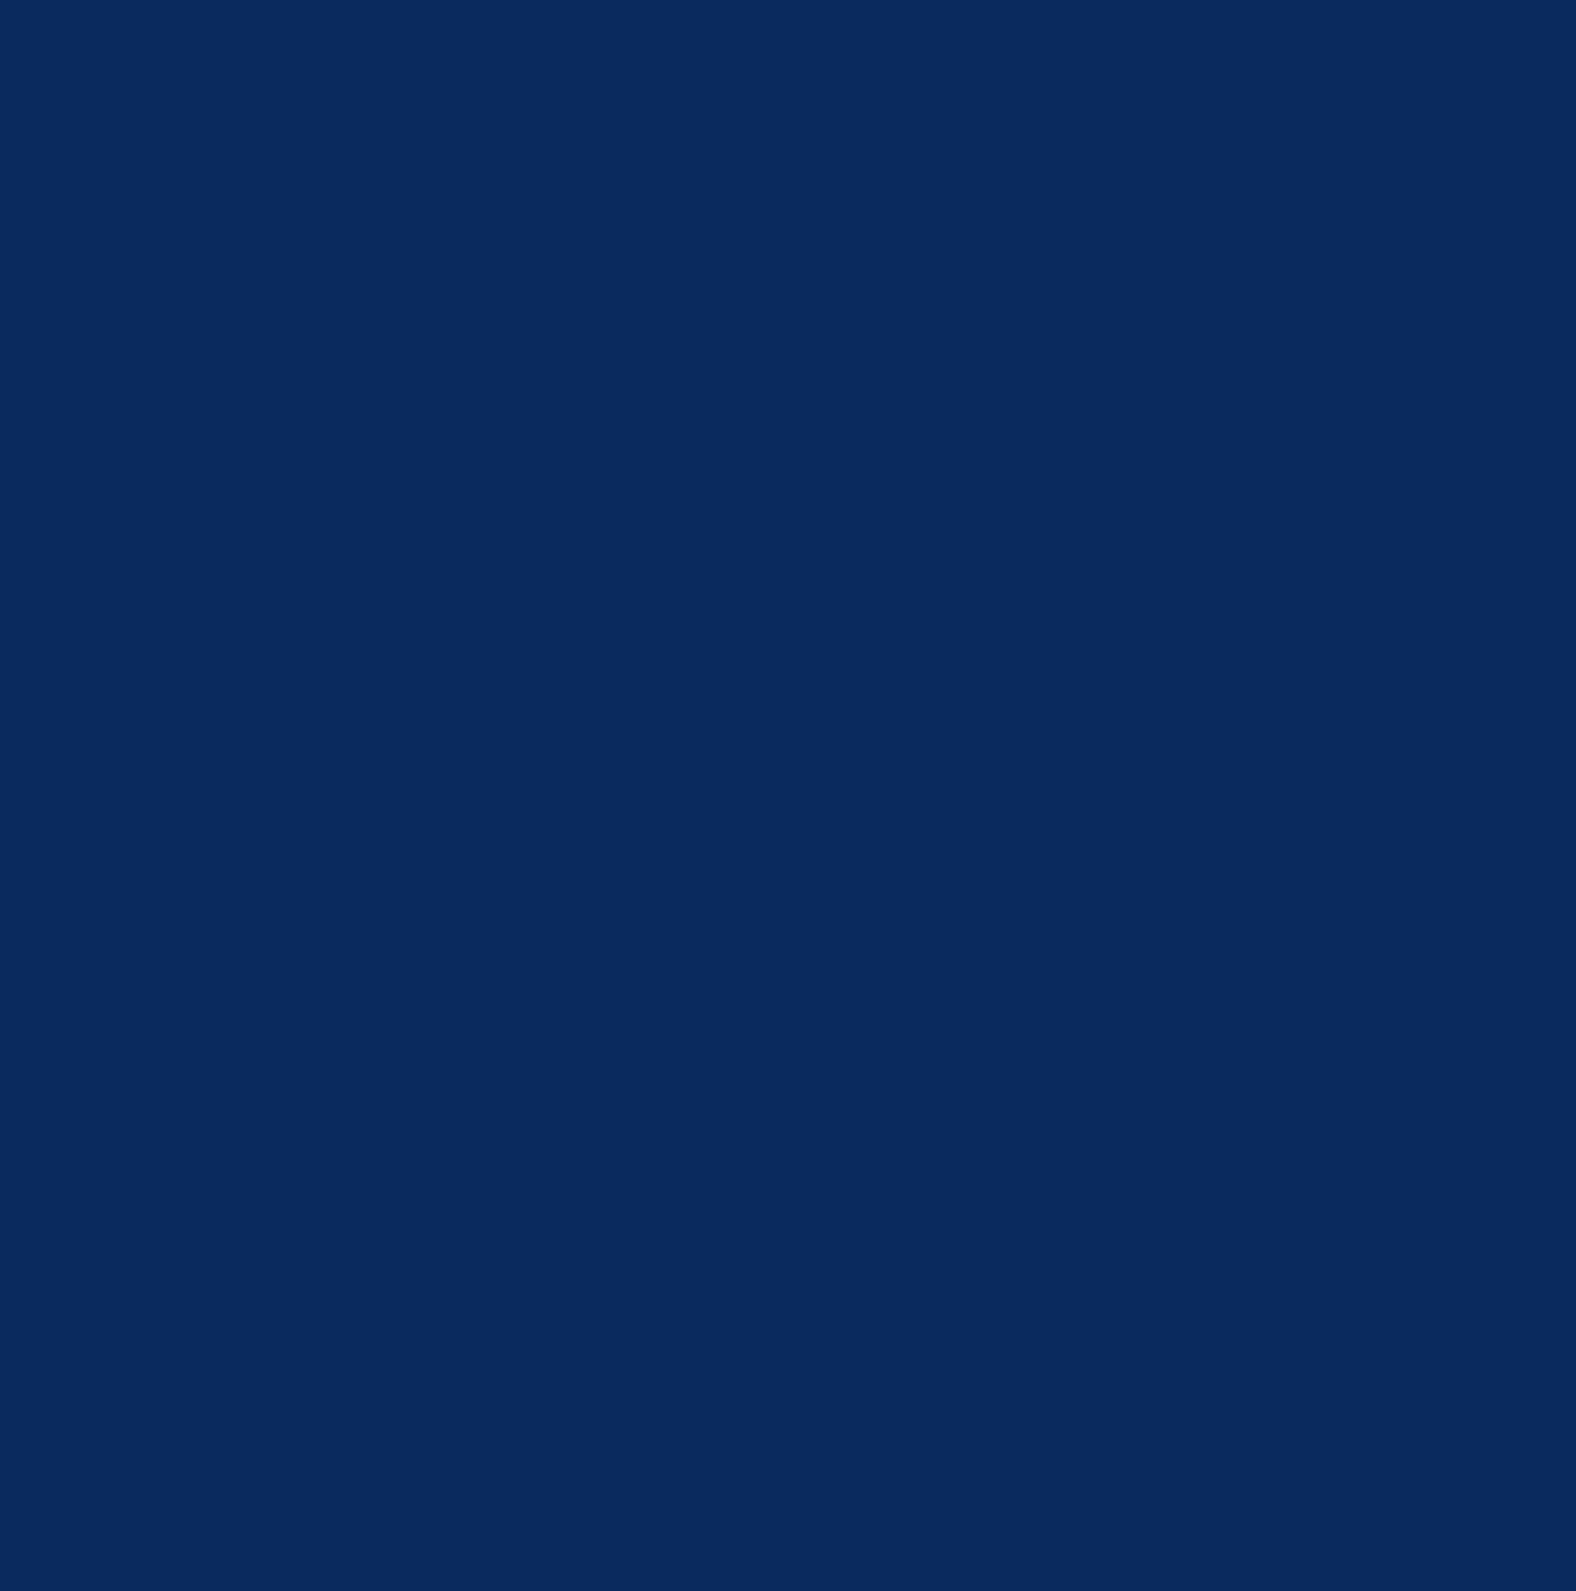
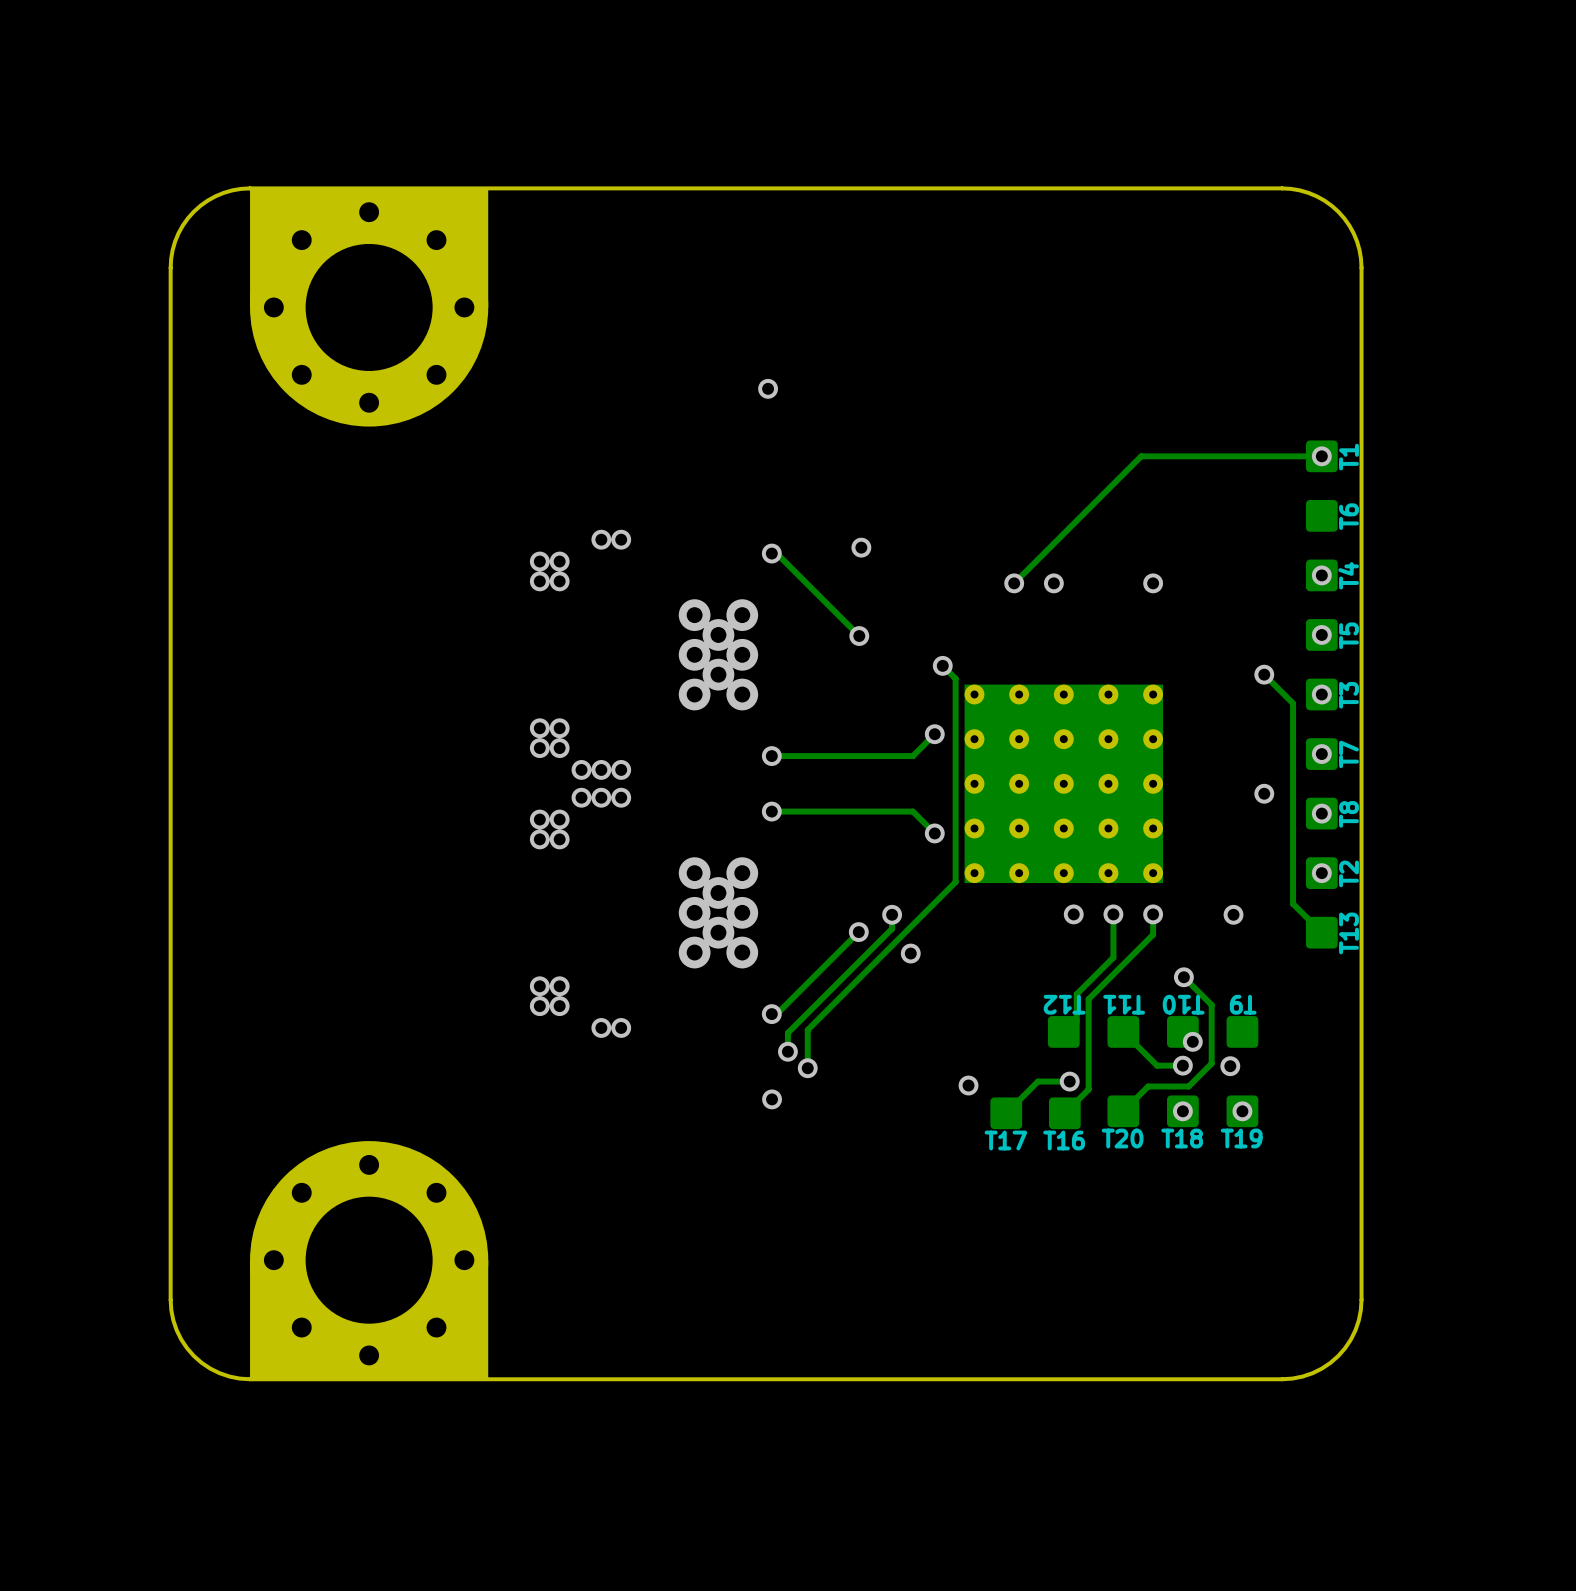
board edge: none -> (1282, 188) (250, 188) (223, 192) (207, 200) (193, 211) (178, 233) (172, 250) (170, 267) (170, 1299) (176, 1330) (193, 1356) (219, 1373) (250, 1379) (1282, 1379) (1312, 1373) (1338, 1356) (1355, 1330) (1361, 1299) (1361, 267) (1359, 250) (1353, 233) (1338, 211) (1324, 200) (1308, 192) (1282, 188)
part: none -> (369, 307)
via: none -> (768, 388)
track: none -> (1321, 456) (1141, 456) (1014, 583)
T1: none -> (1321, 456)
via: none -> (1321, 456)
T6: none -> (1321, 515)
via: none -> (601, 539)
via: none -> (621, 539)
via: none -> (861, 547)
track: none -> (771, 553) (776, 553) (859, 636)
via: none -> (771, 553)
via: none -> (539, 561)
via: none -> (559, 561)
T4: none -> (1321, 575)
via: none -> (1321, 575)
via: none -> (539, 581)
via: none -> (559, 581)
via: none -> (1014, 583)
via: none -> (1053, 583)
via: none -> (1153, 583)
via: none -> (694, 615)
via: none -> (742, 615)
via: none -> (718, 634)
T5: none -> (1321, 634)
via: none -> (1321, 634)
via: none -> (859, 636)
via: none -> (694, 654)
via: none -> (742, 654)
track: none -> (942, 665) (955, 678) (955, 882) (807, 1029) (807, 1068)
via: none -> (942, 665)
via: none -> (718, 674)
track: none -> (1264, 674) (1293, 703) (1293, 903) (1321, 932)
via: none -> (1264, 674)
via: none -> (694, 694)
via: none -> (742, 694)
T3: none -> (1321, 694)
via: none -> (1321, 694)
via: none -> (539, 728)
via: none -> (559, 728)
track: none -> (934, 734) (912, 756) (771, 756)
via: none -> (934, 734)
via: none -> (539, 748)
via: none -> (559, 748)
T7: none -> (1321, 754)
via: none -> (1321, 754)
via: none -> (771, 756)
via: none -> (581, 769)
via: none -> (601, 769)
via: none -> (621, 769)
part: none -> (1063, 783)
via: none -> (1264, 793)
via: none -> (581, 797)
via: none -> (601, 797)
via: none -> (621, 797)
track: none -> (771, 811) (912, 811) (934, 833)
via: none -> (771, 811)
T8: none -> (1321, 813)
via: none -> (1321, 813)
via: none -> (539, 819)
via: none -> (559, 819)
via: none -> (934, 833)
via: none -> (539, 839)
via: none -> (559, 839)
via: none -> (694, 873)
via: none -> (742, 873)
T2: none -> (1321, 873)
via: none -> (1321, 873)
via: none -> (718, 892)
via: none -> (694, 912)
via: none -> (742, 912)
track: none -> (892, 914) (892, 928) (787, 1032) (787, 1051)
via: none -> (892, 914)
via: none -> (1073, 914)
track: none -> (1113, 914) (1113, 957) (1076, 994) (1076, 1022)
via: none -> (1113, 914)
track: none -> (1153, 914) (1153, 934) (1088, 999) (1088, 1089) (1064, 1113)
via: none -> (1153, 914)
via: none -> (1233, 914)
via: none -> (718, 932)
track: none -> (858, 932) (776, 1014) (771, 1014)
via: none -> (858, 932)
T13: none -> (1321, 932)
via: none -> (694, 952)
via: none -> (742, 952)
via: none -> (910, 953)
track: none -> (1183, 977) (1211, 1005) (1211, 1063) (1188, 1086) (1148, 1086) (1123, 1111)
via: none -> (1183, 977)
via: none -> (539, 986)
via: none -> (559, 986)
via: none -> (539, 1006)
via: none -> (559, 1006)
via: none -> (771, 1014)
via: none -> (601, 1027)
via: none -> (621, 1027)
T12: none -> (1063, 1031)
track: none -> (1123, 1031) (1157, 1065) (1182, 1065)
T11: none -> (1123, 1031)
T10: none -> (1182, 1031)
T9: none -> (1242, 1031)
via: none -> (1192, 1041)
via: none -> (787, 1051)
via: none -> (1182, 1065)
via: none -> (1230, 1066)
via: none -> (807, 1068)
track: none -> (1069, 1081) (1038, 1081) (1006, 1113)
via: none -> (1069, 1081)
via: none -> (968, 1085)
via: none -> (772, 1099)
T20: none -> (1123, 1111)
T18: none -> (1182, 1111)
via: none -> (1182, 1111)
T19: none -> (1242, 1111)
via: none -> (1242, 1111)
T17: none -> (1006, 1113)
T16: none -> (1064, 1113)
part: none -> (369, 1260)

